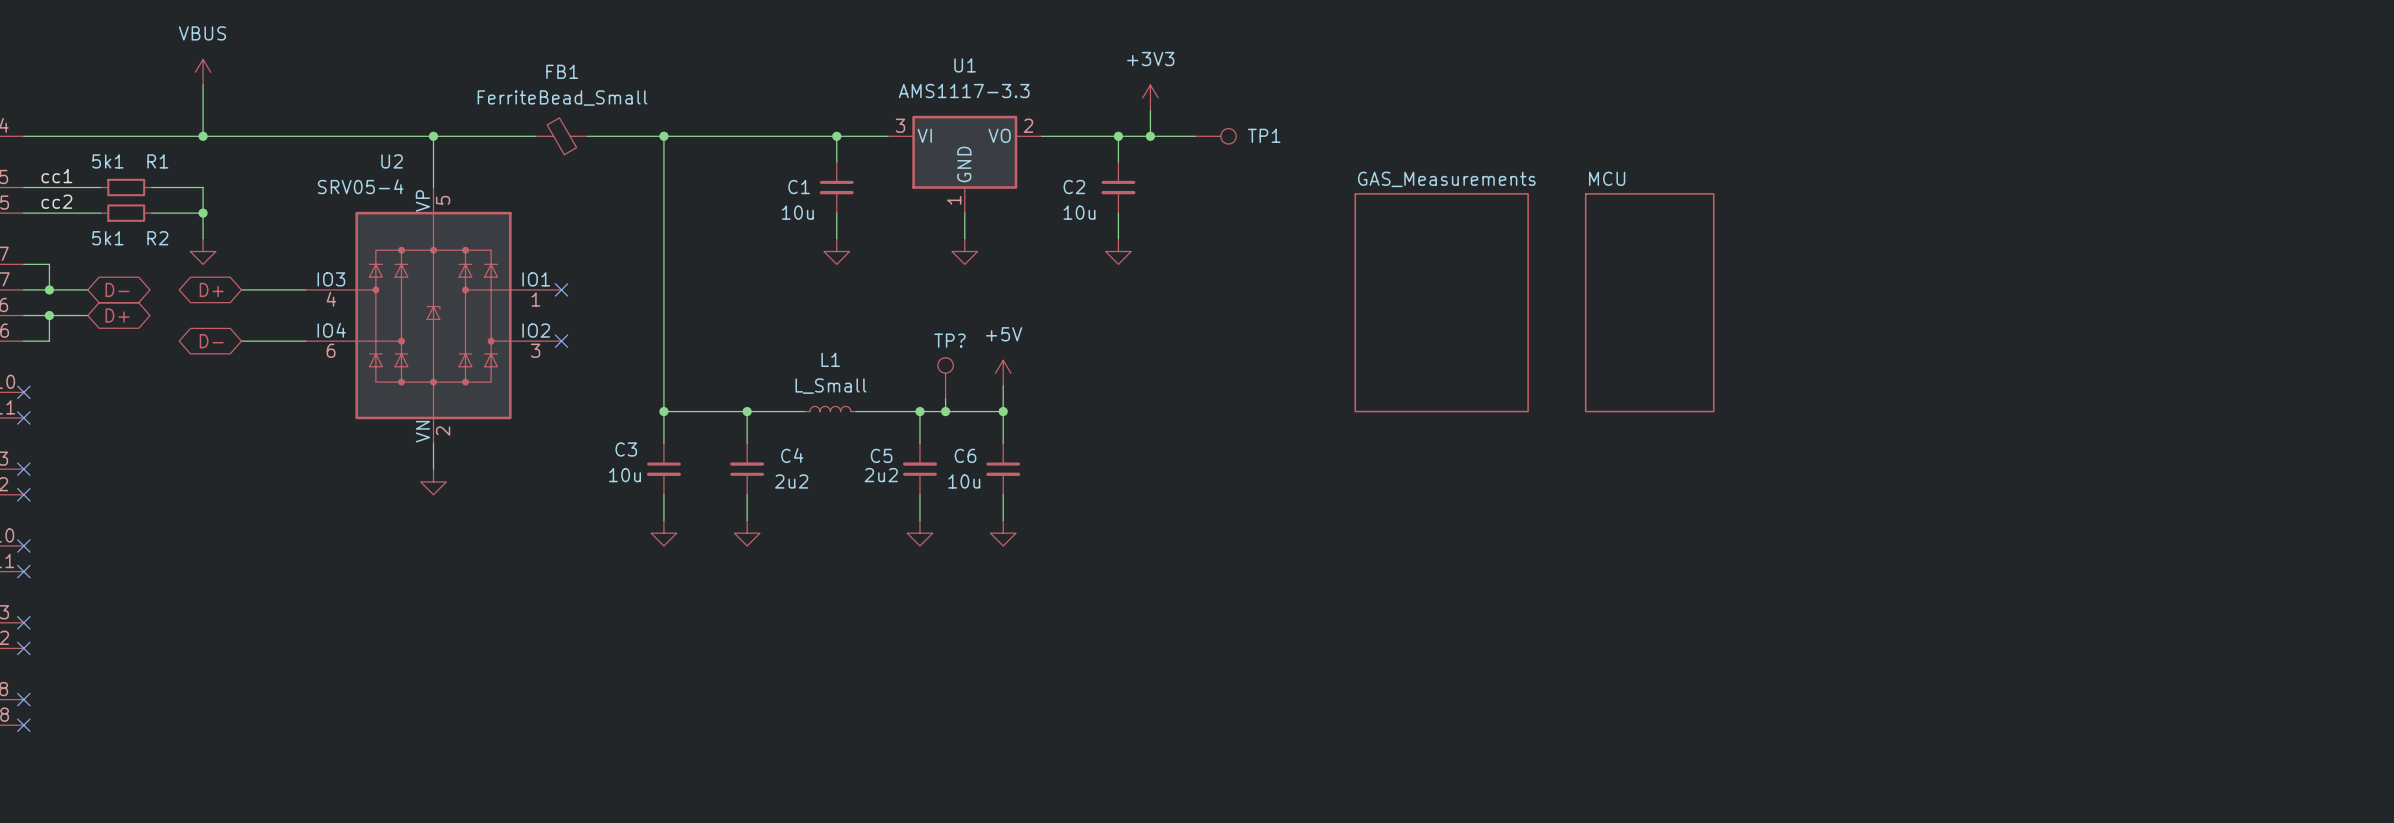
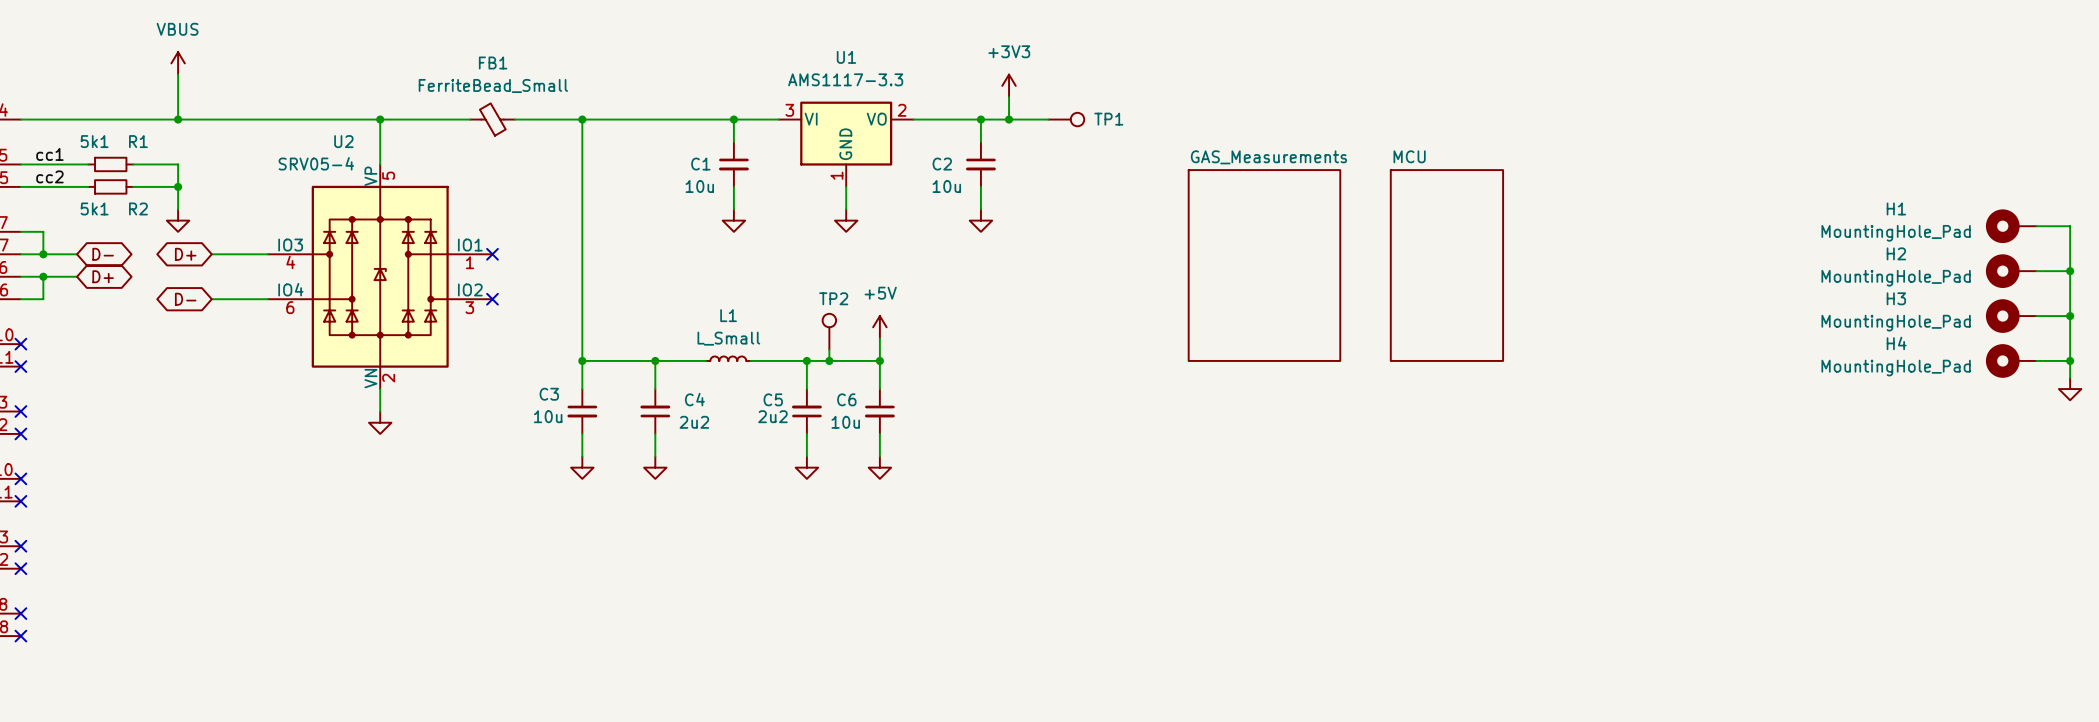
H1: none -> MountingHole_Pad (2011, 226)
wire: none -> (2036, 226) (2070, 226) (2070, 377)
H2: none -> MountingHole_Pad (2011, 271)
wire: none -> (2036, 271) (2070, 271)
junction: none -> (2070, 271)
TP? name: TP? (949, 340) -> TP2 (833, 298)
H3: none -> MountingHole_Pad (2011, 316)
wire: none -> (2036, 316) (2070, 316)
junction: none -> (2070, 316)
H4: none -> MountingHole_Pad (2011, 360)
wire: none -> (2036, 360) (2070, 360)
junction: none -> (2070, 360)
power symbol: none -> (2070, 389)

